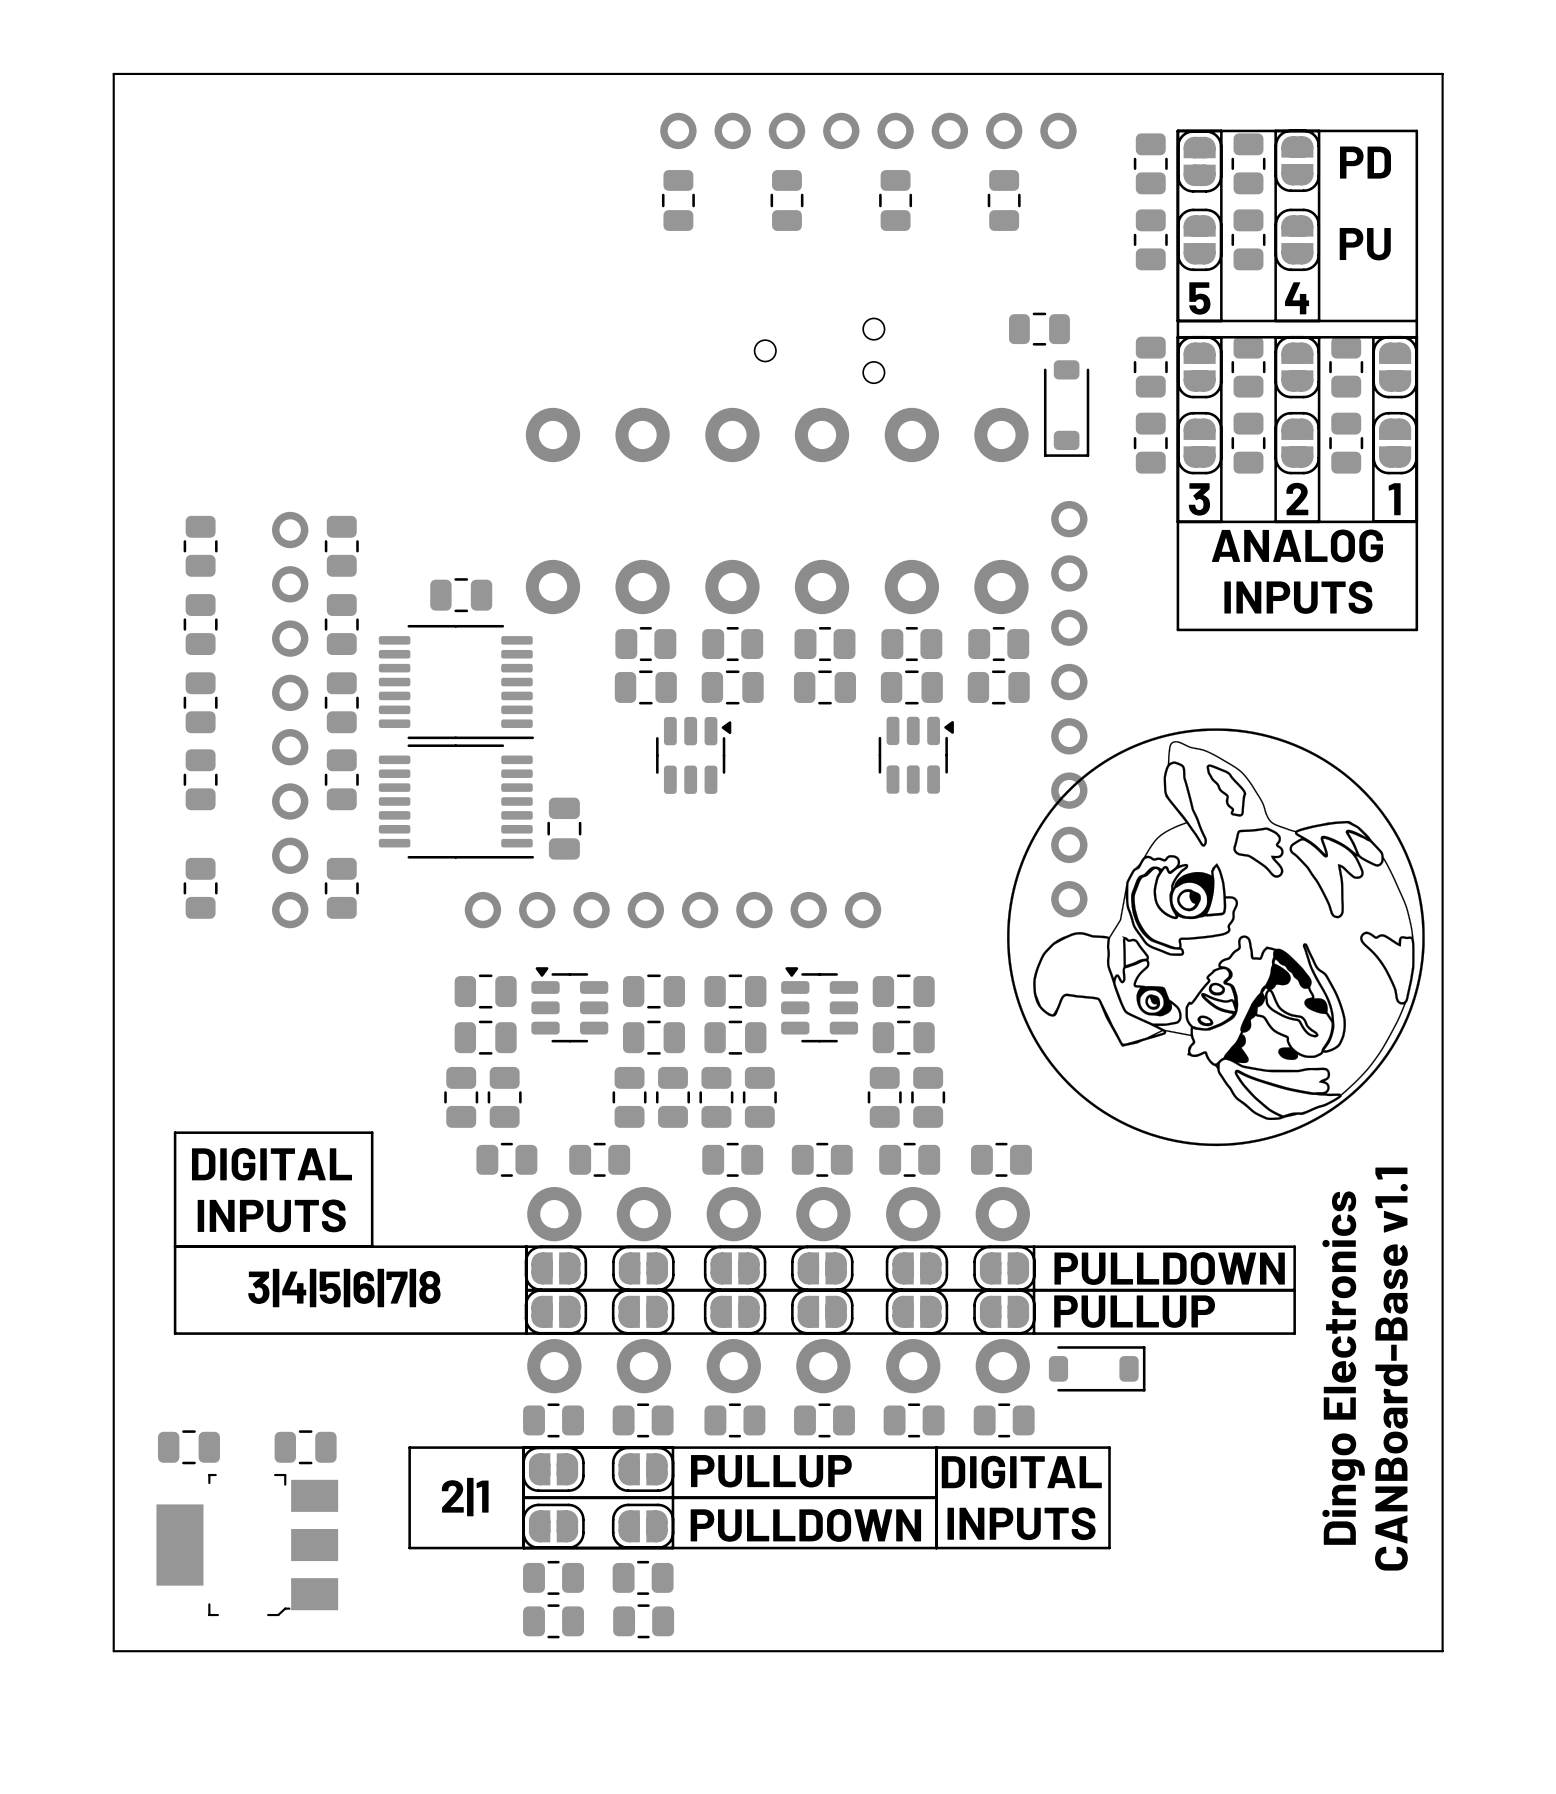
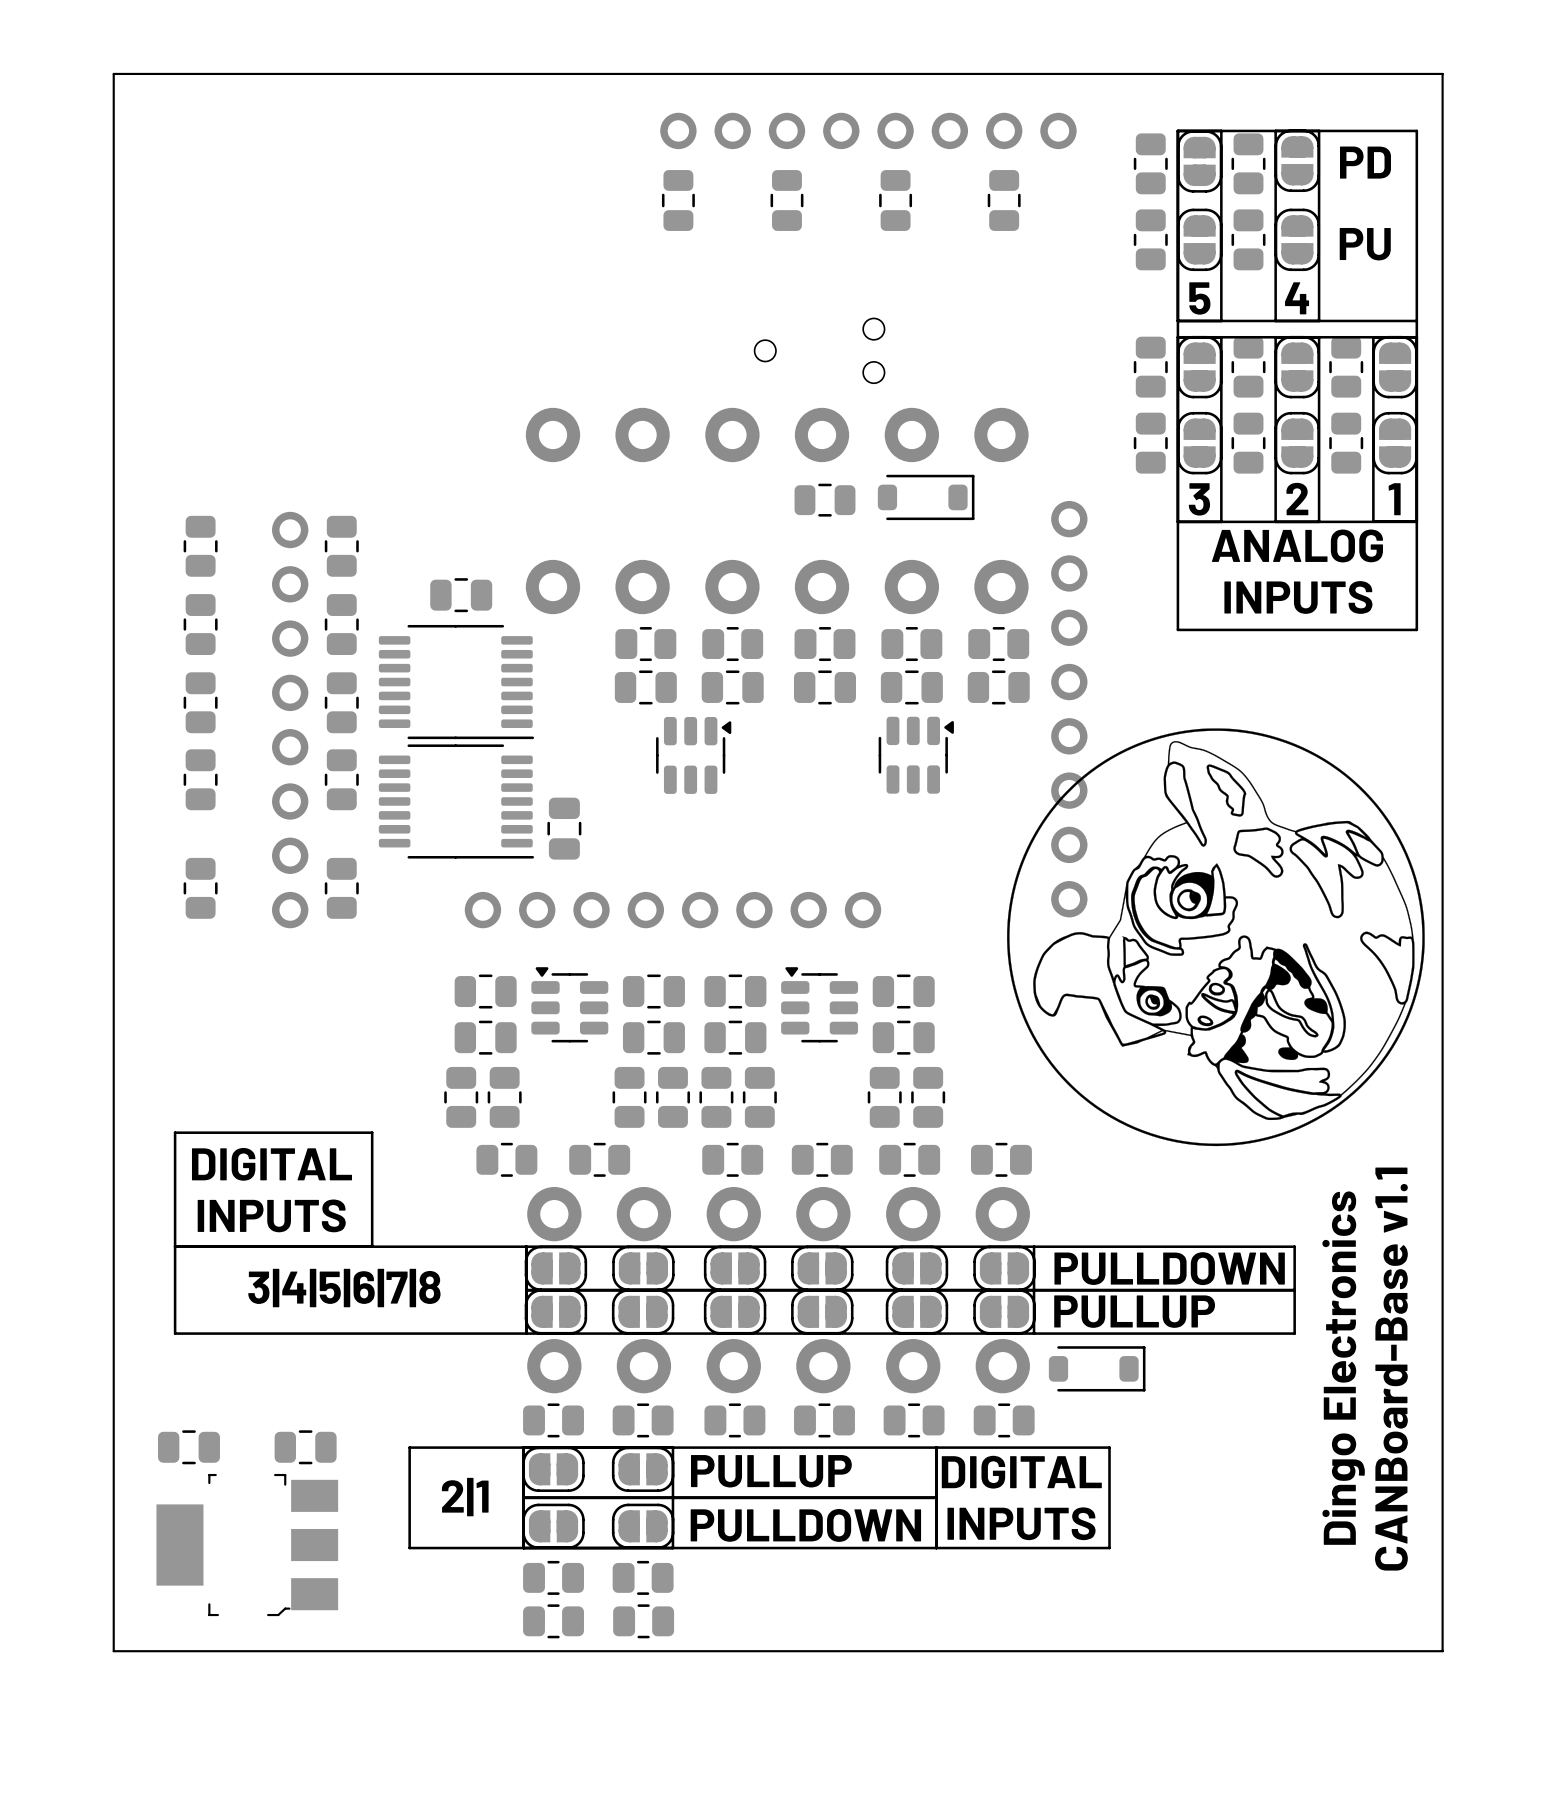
part position: (1039, 329) -> (825, 500)
part rotation: 0° (1066, 408) -> 90° counterclockwise (926, 497)
part position: (1066, 408) -> (926, 497)

